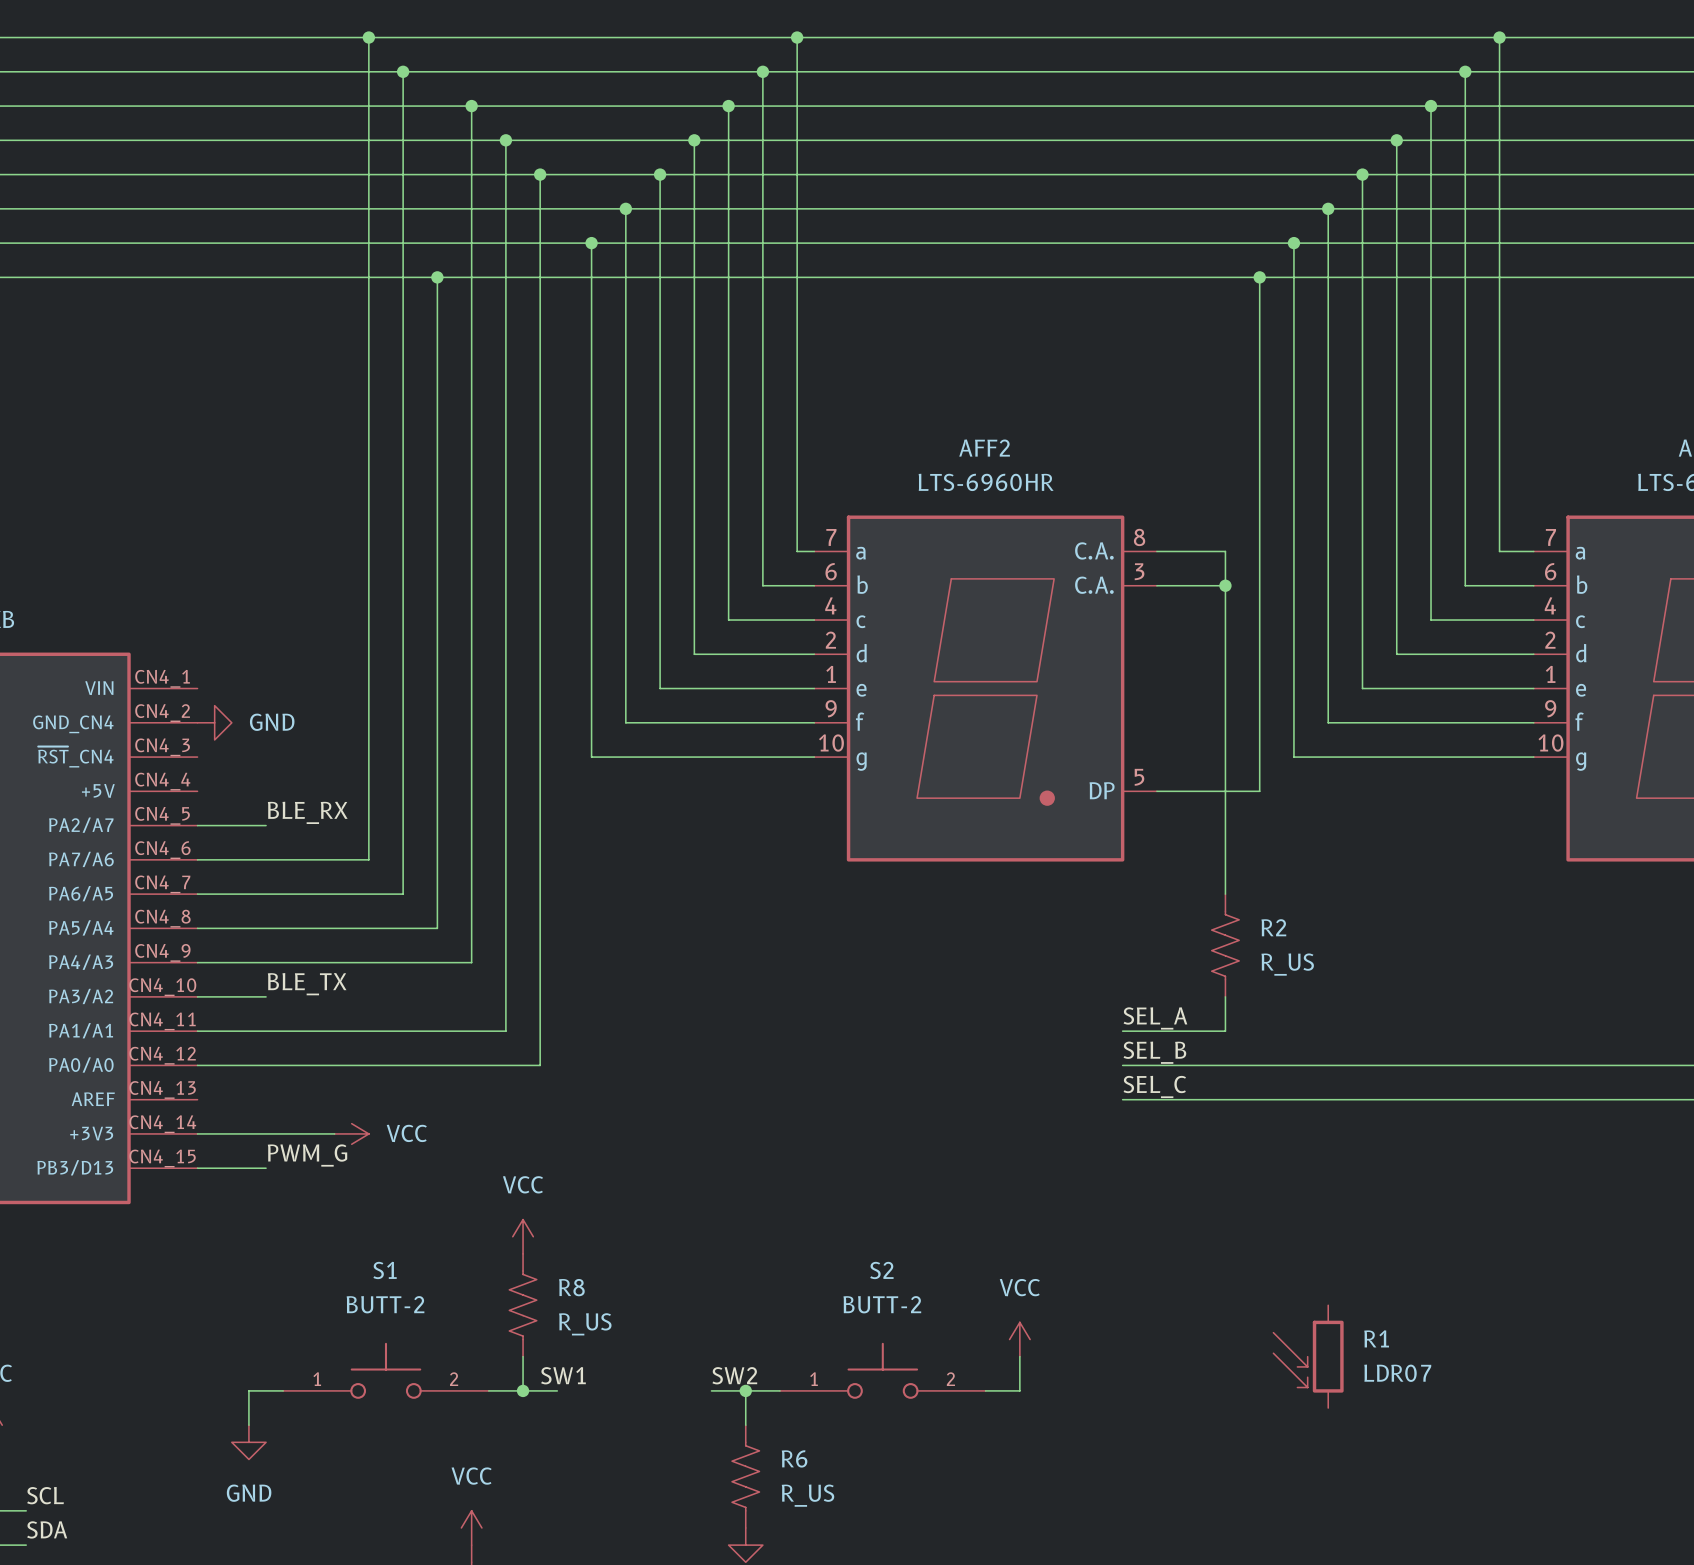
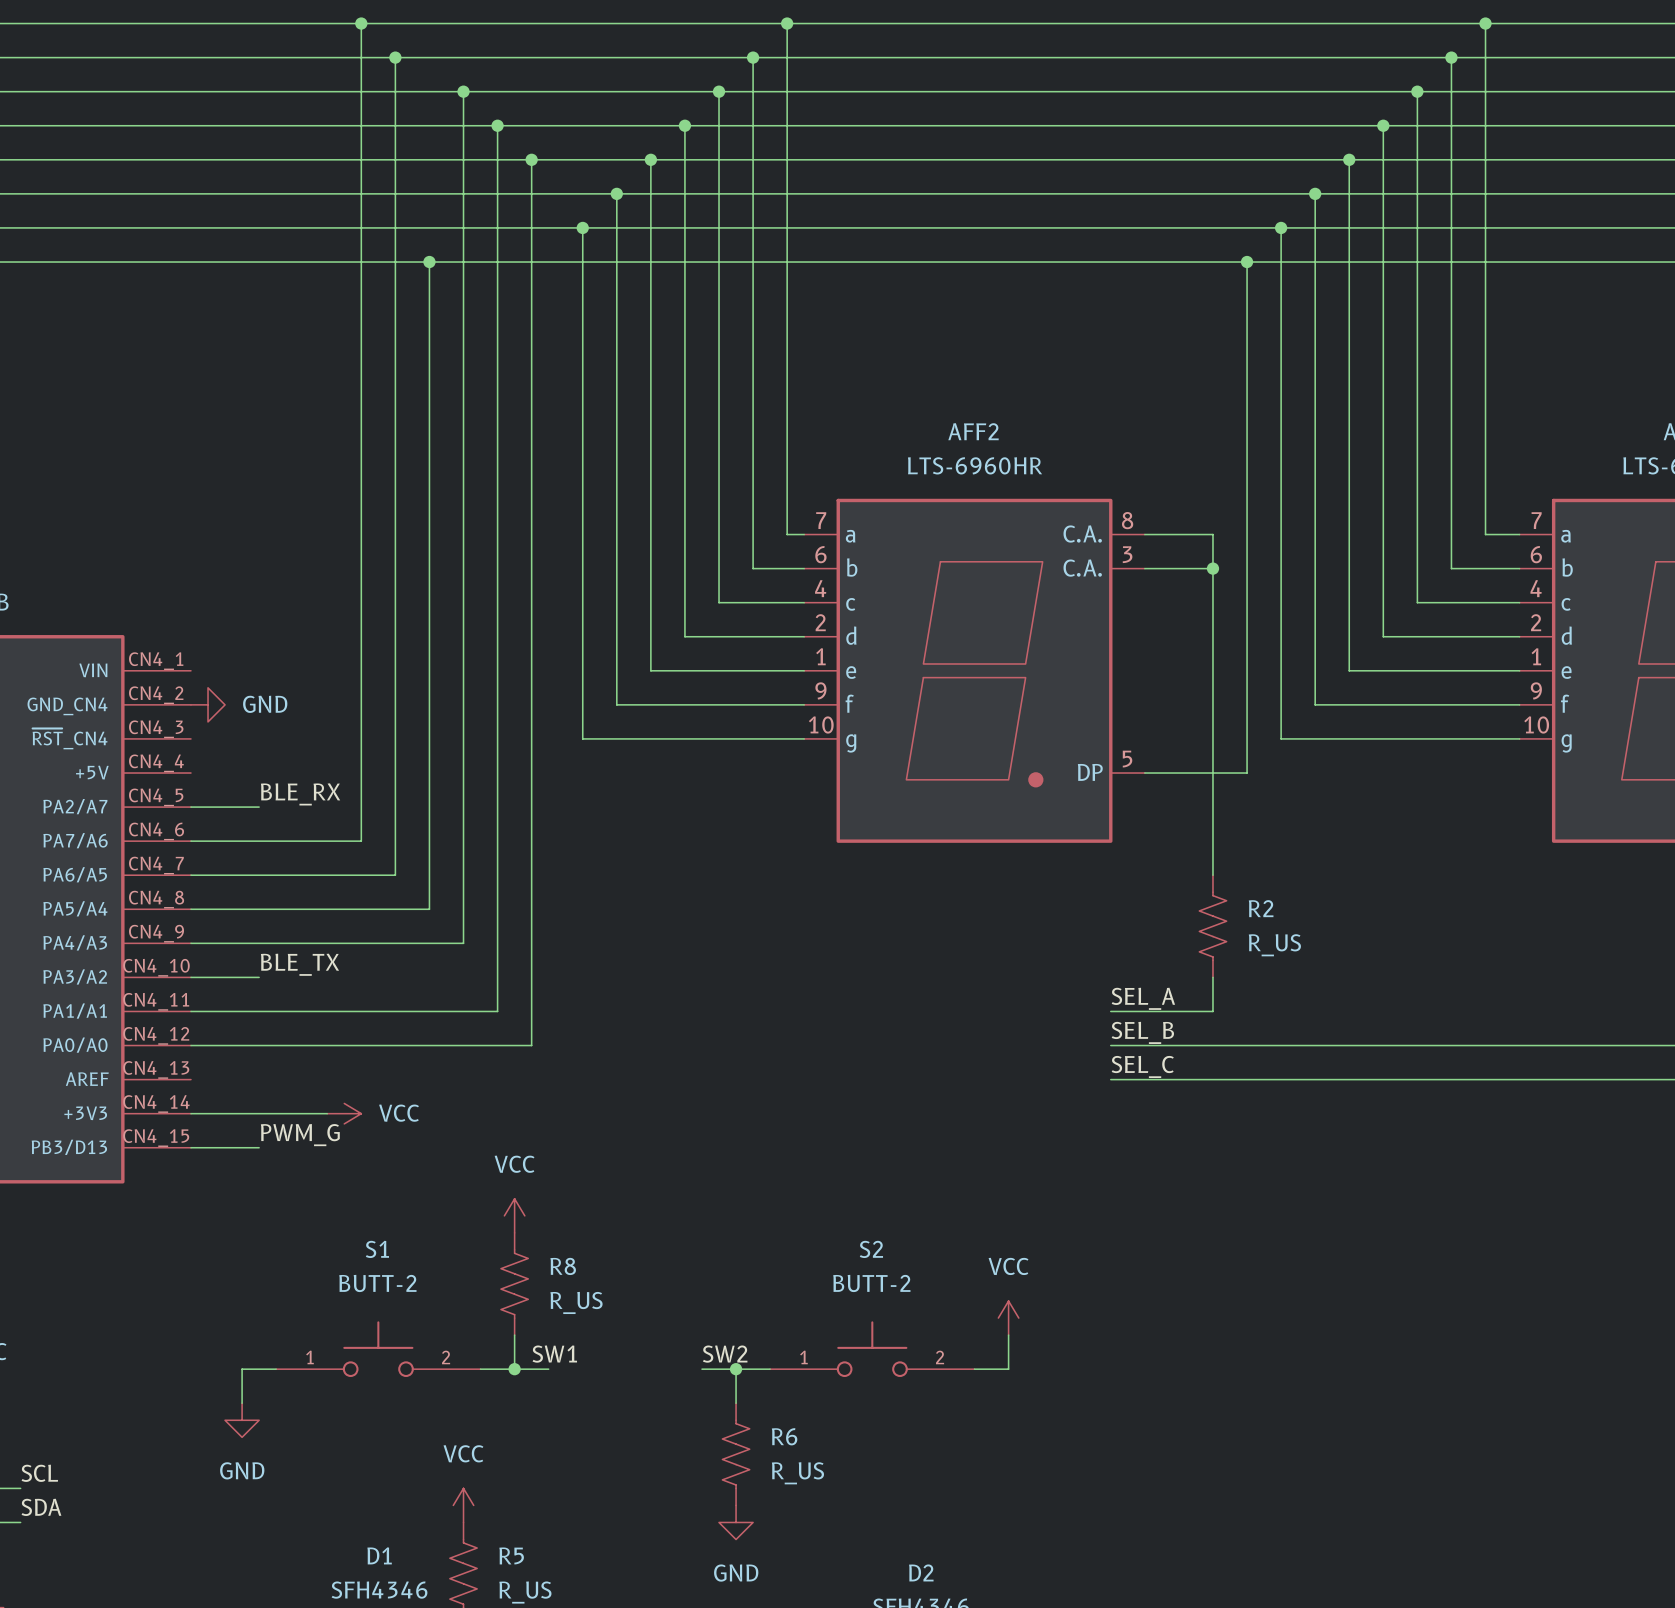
R1: LDR07 (1308, 1356) -> none

